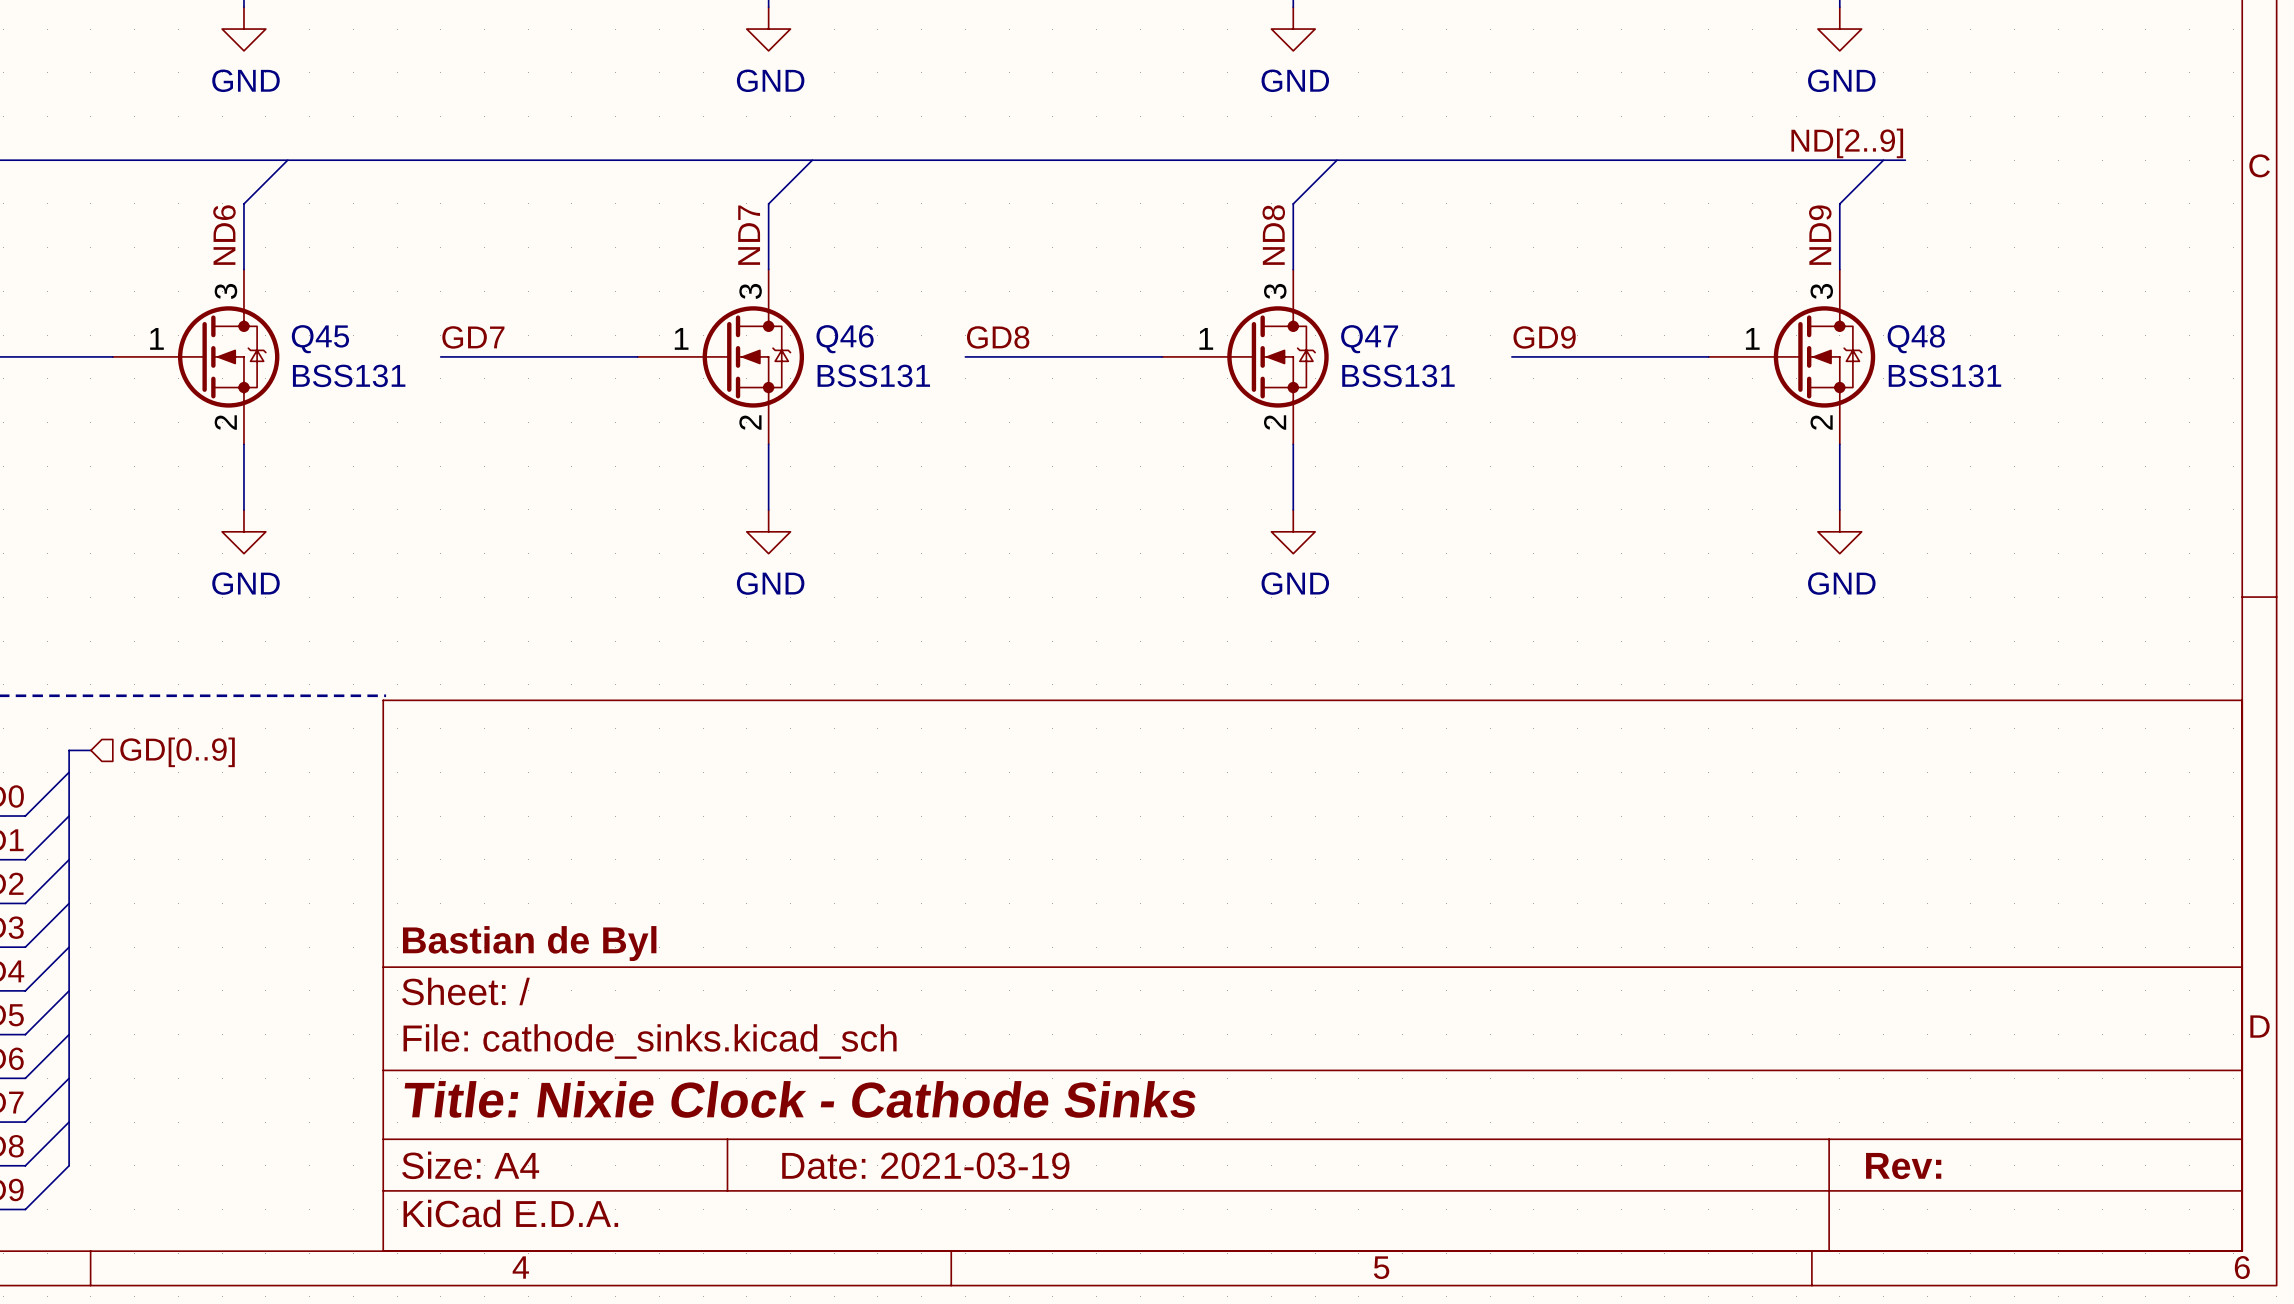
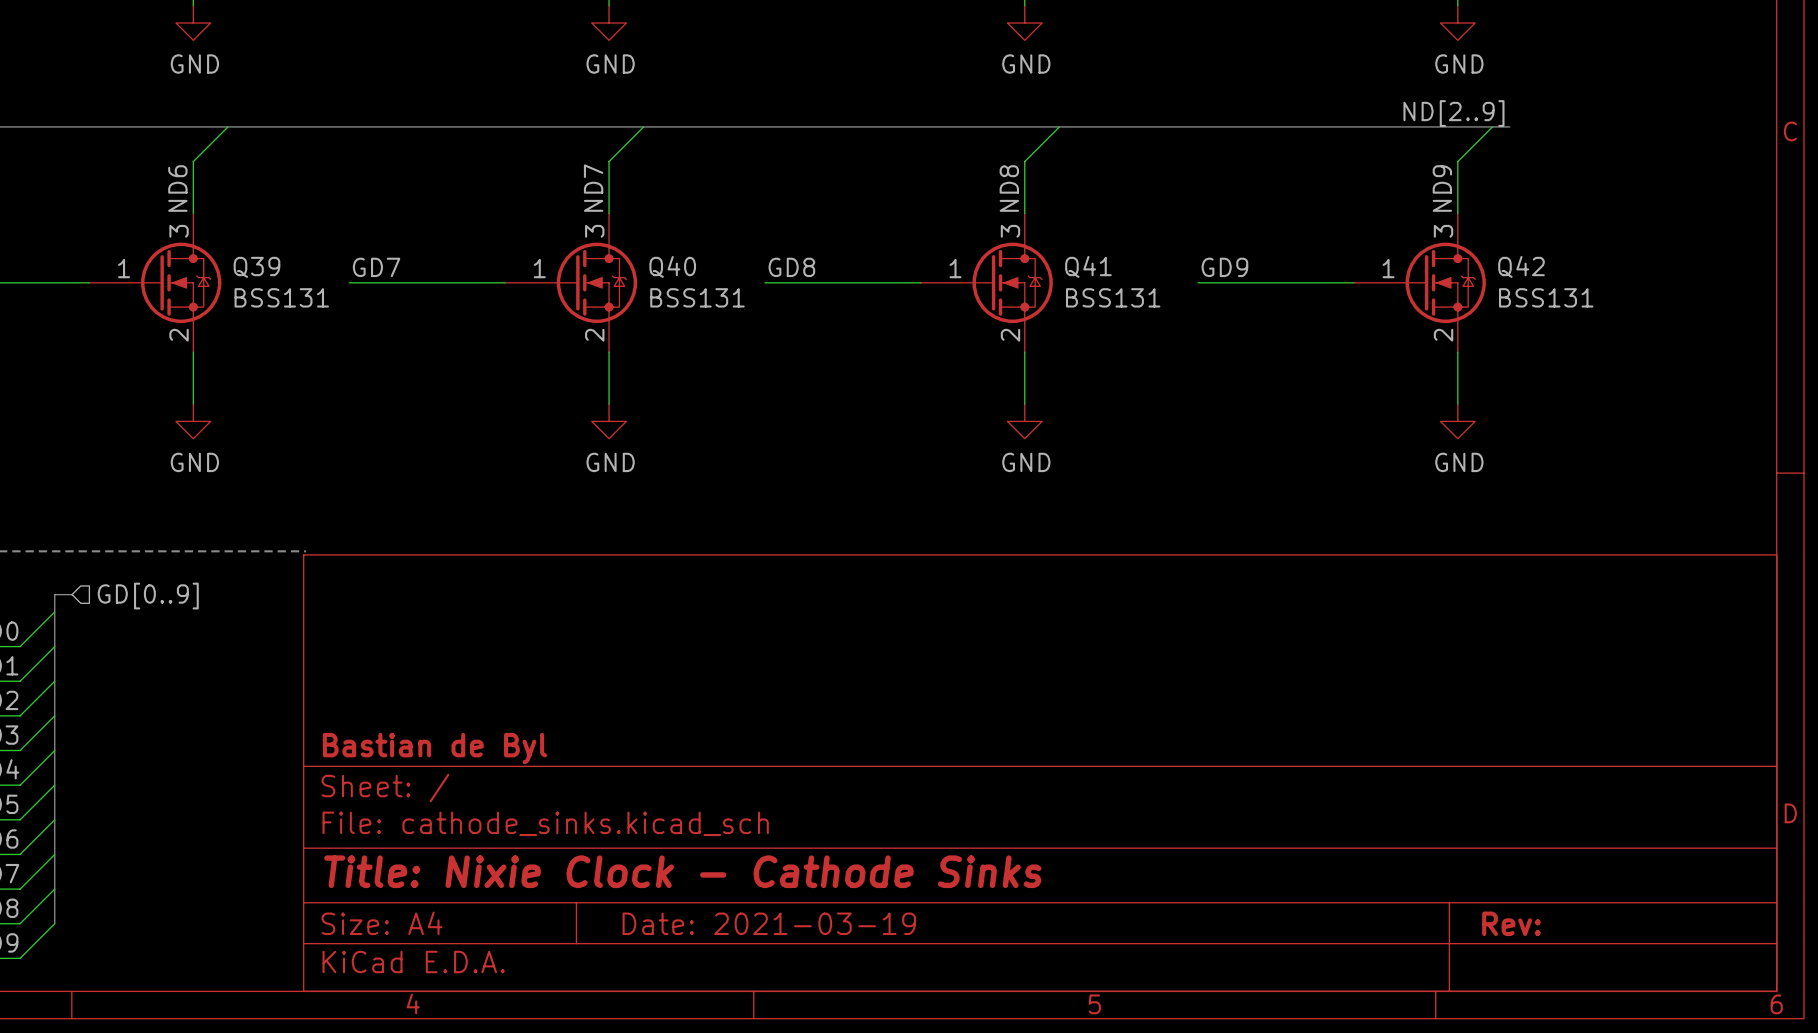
Q45 name: Q45 (320, 339) -> Q39 (256, 267)
Q46 name: Q46 (845, 339) -> Q40 (672, 266)
Q47 name: Q47 (1369, 339) -> Q41 (1088, 266)
Q48 name: Q48 (1916, 339) -> Q42 (1521, 266)

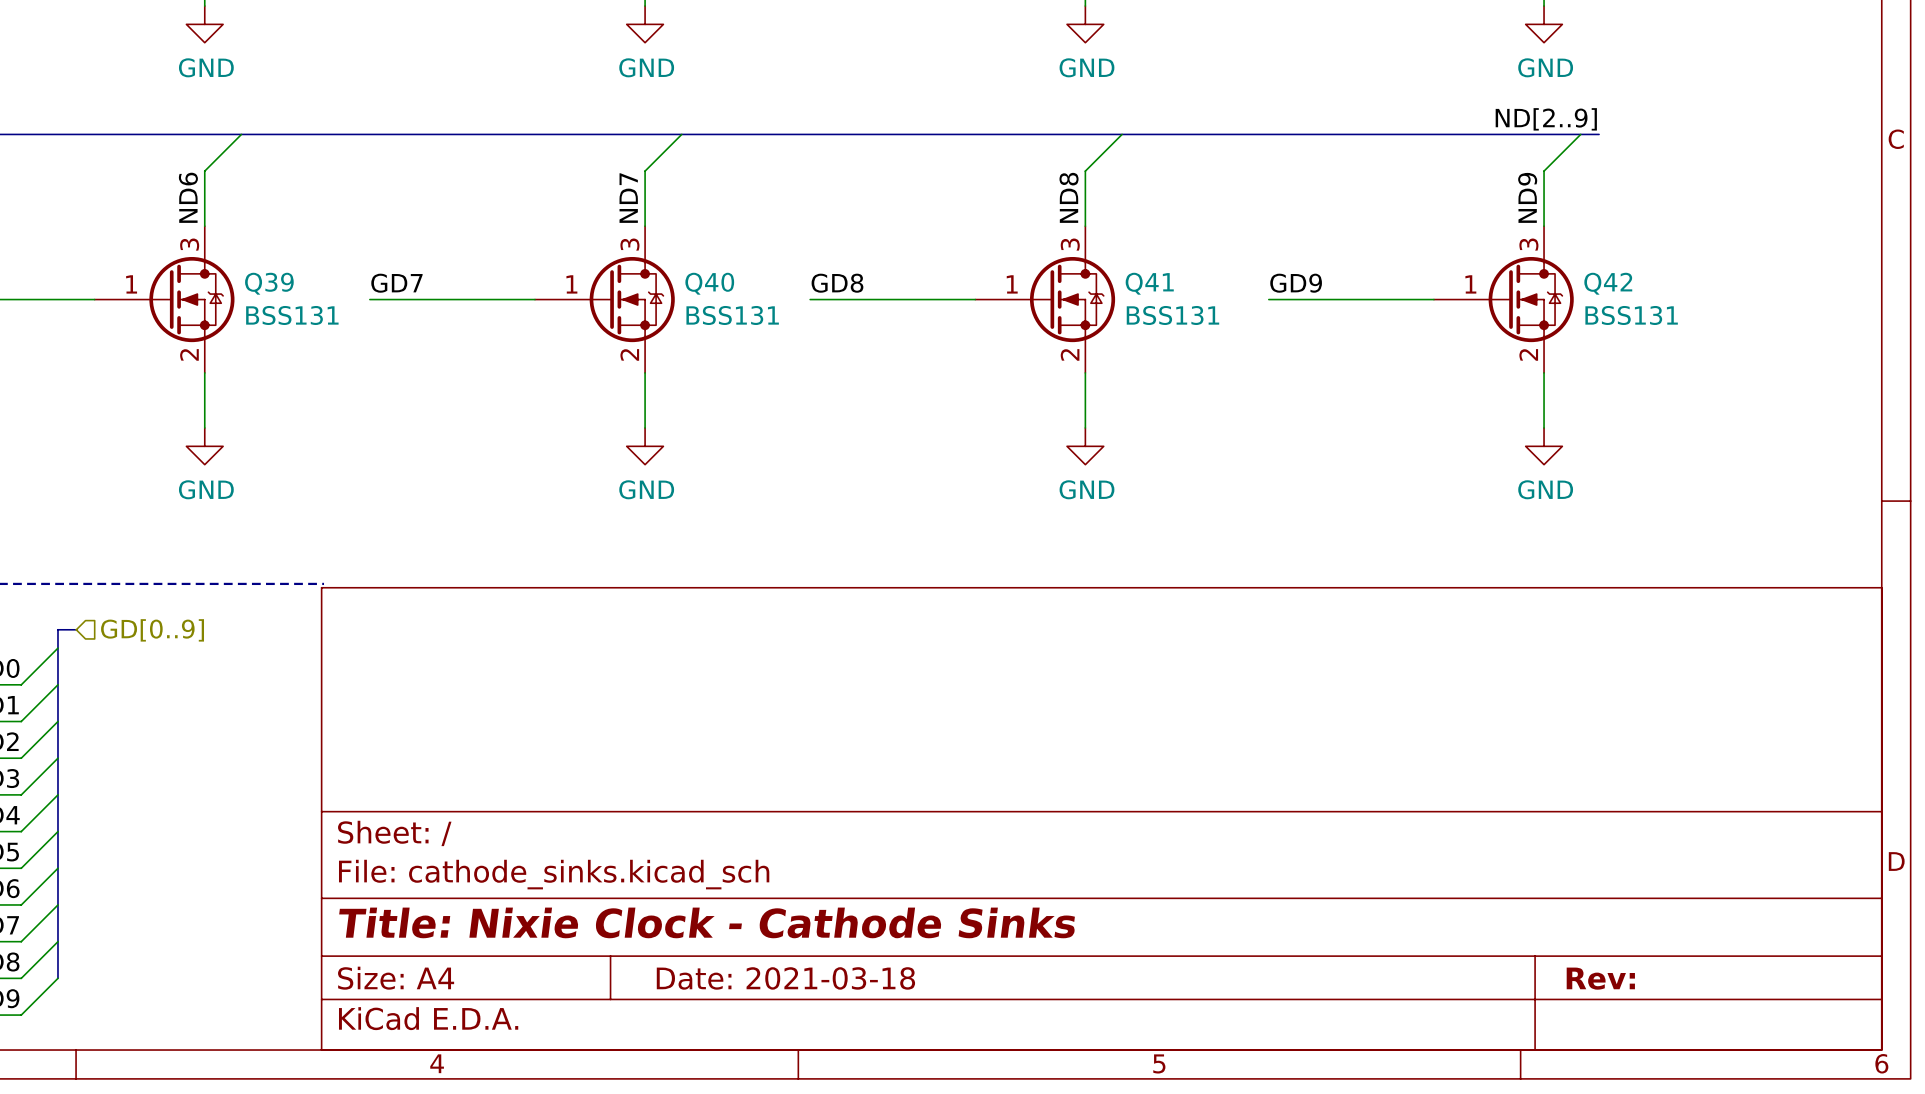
title block: Bastian de Byl (434, 748) -> none
title block: Date: 2021-03-19 (769, 923) -> Date: 2021-03-18 (785, 978)

